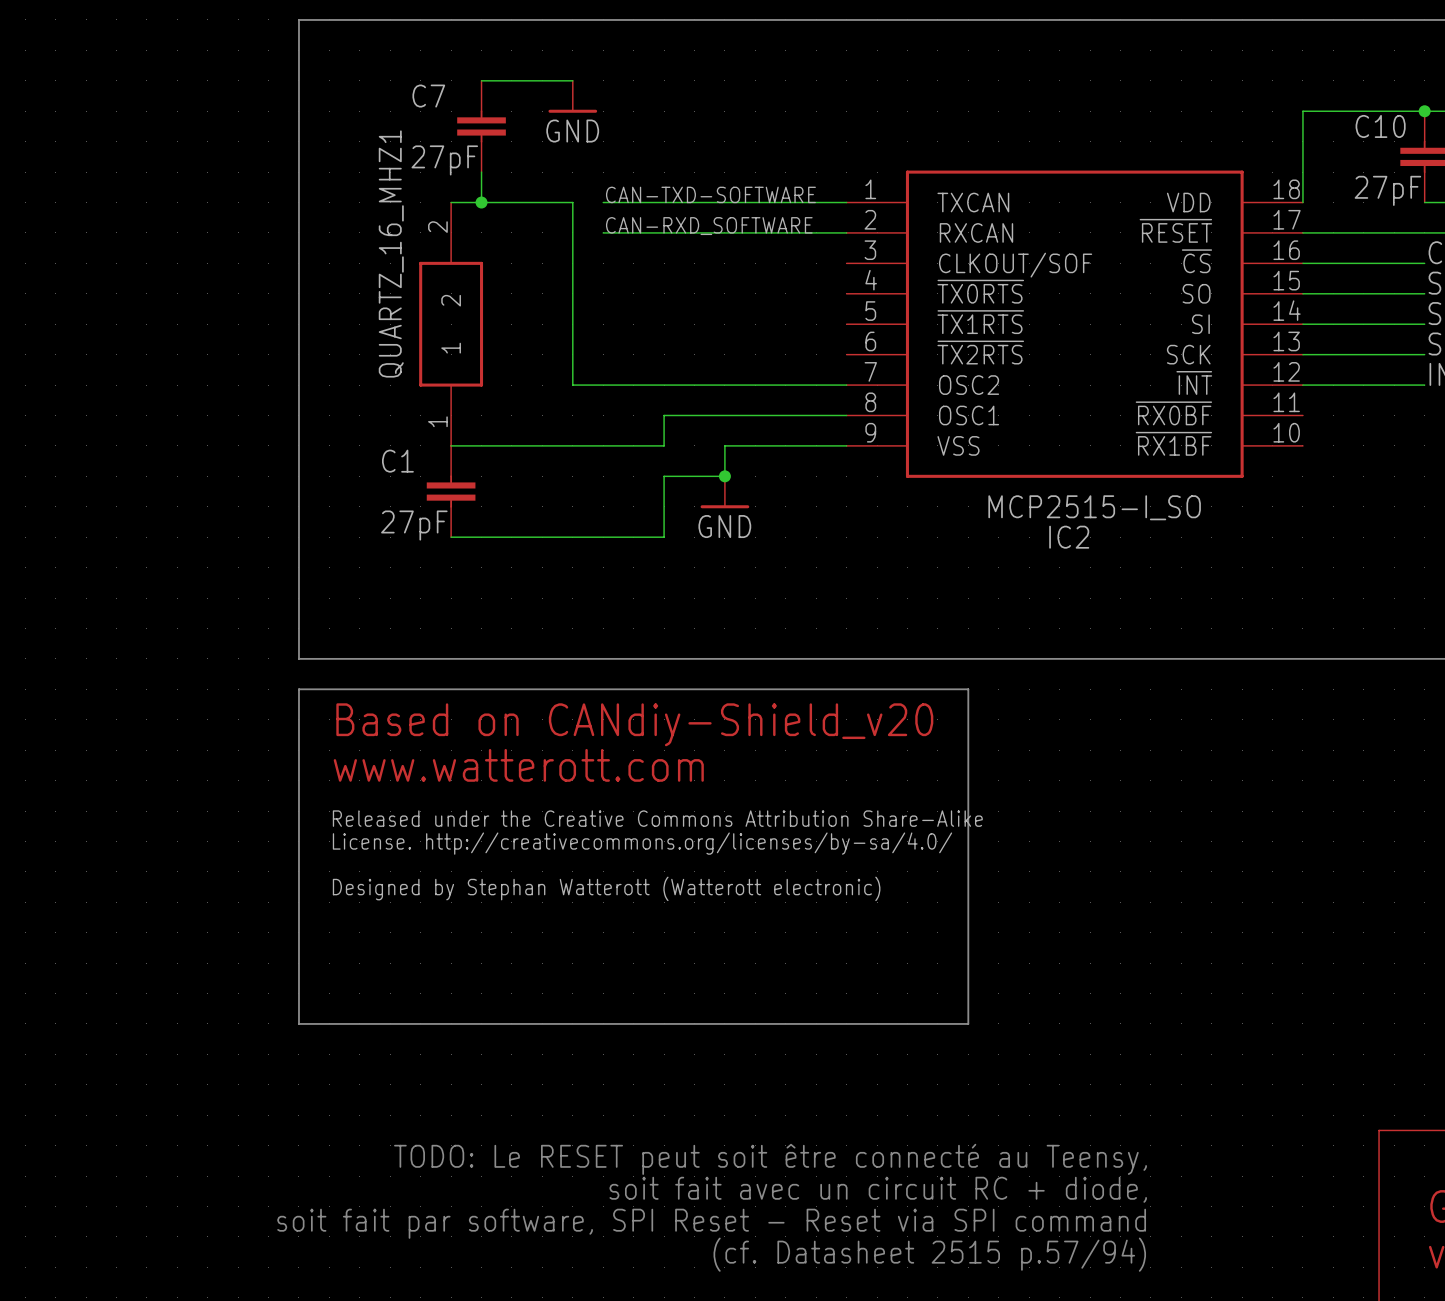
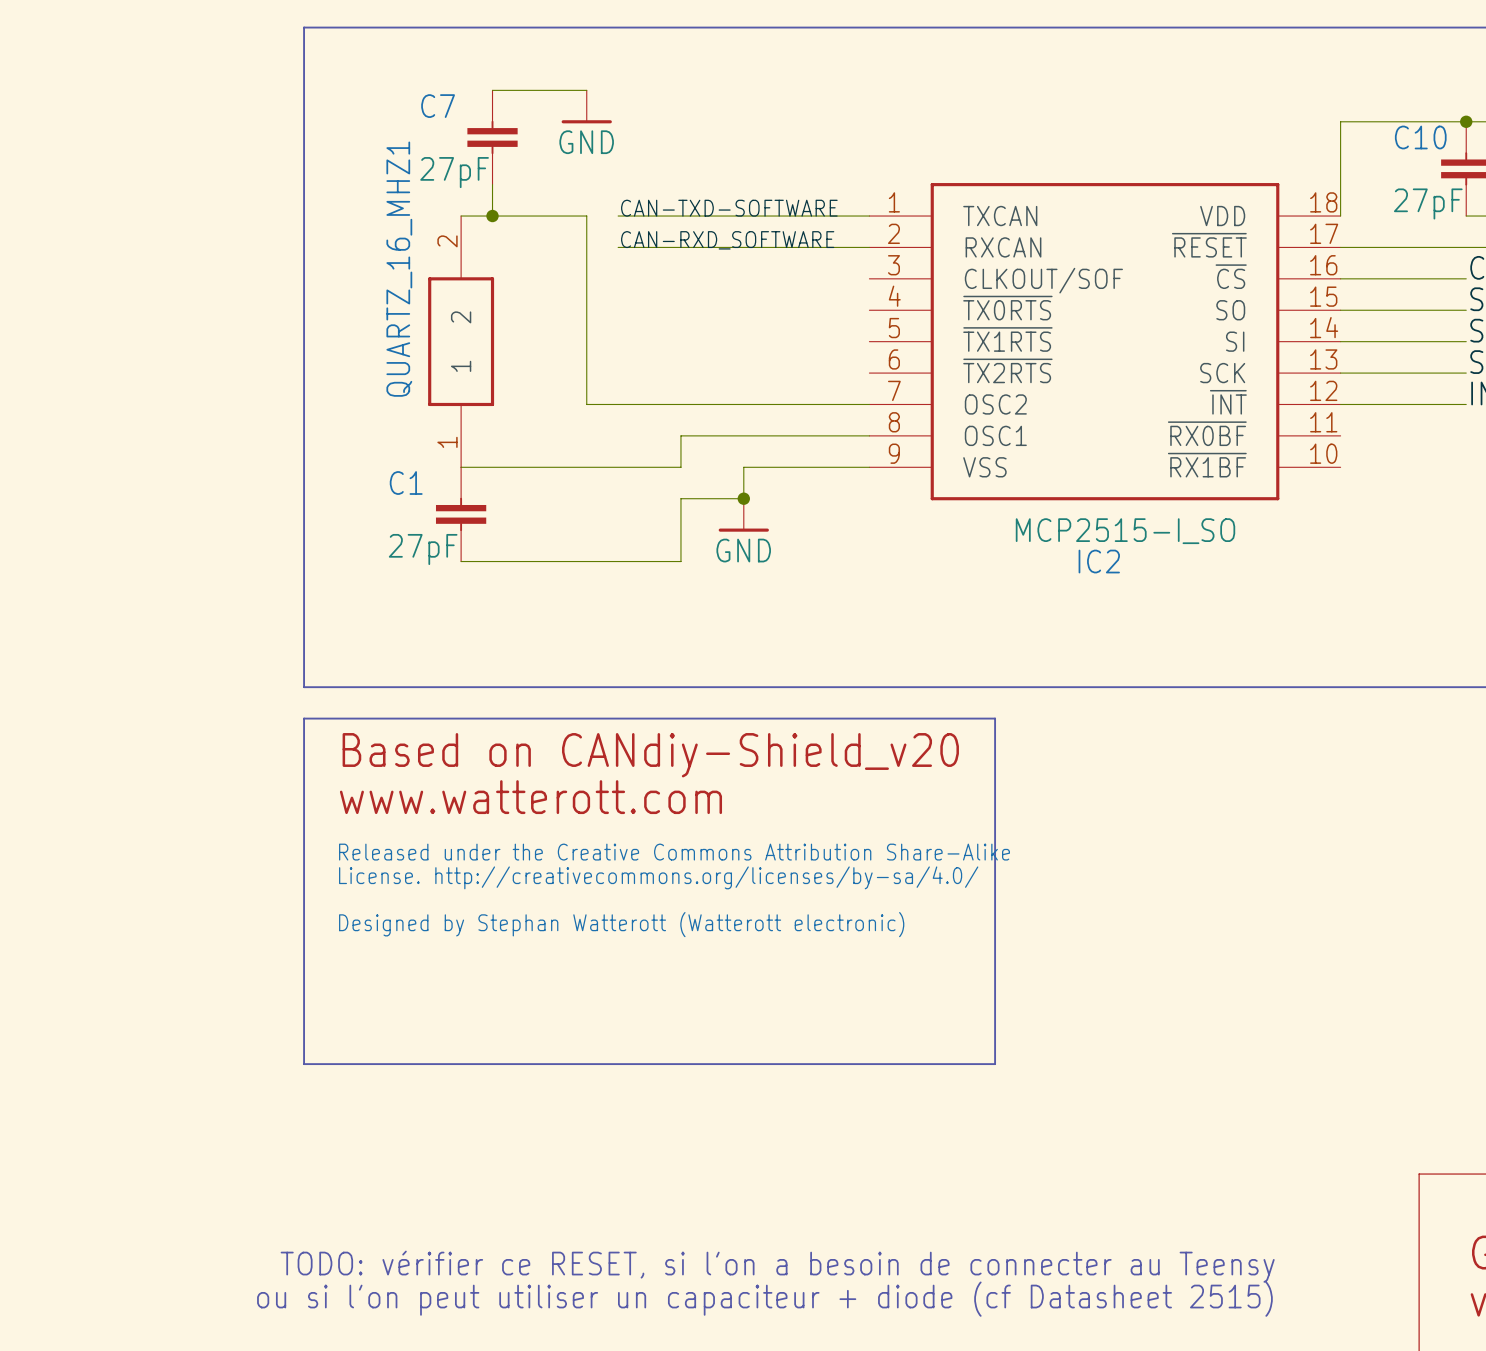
text: TODO: Le RESET peut soit être connecté au Teensy, (770, 1159) -> none
text: soit fait avec un circuit RC + diode, (878, 1189) -> none
text: none -> TODO: vérifier ce RESET, si l'on a besoin de connecter au Teensy (777, 1266)
text: soit fait par software, SPI Reset - Reset via SPI command (711, 1223) -> none
text: none -> ou si l'on peut utiliser un capaciteur + diode (cf Datasheet 2515) (764, 1299)
text: (cf. Datasheet 2515 p.57/94) (929, 1254) -> none

